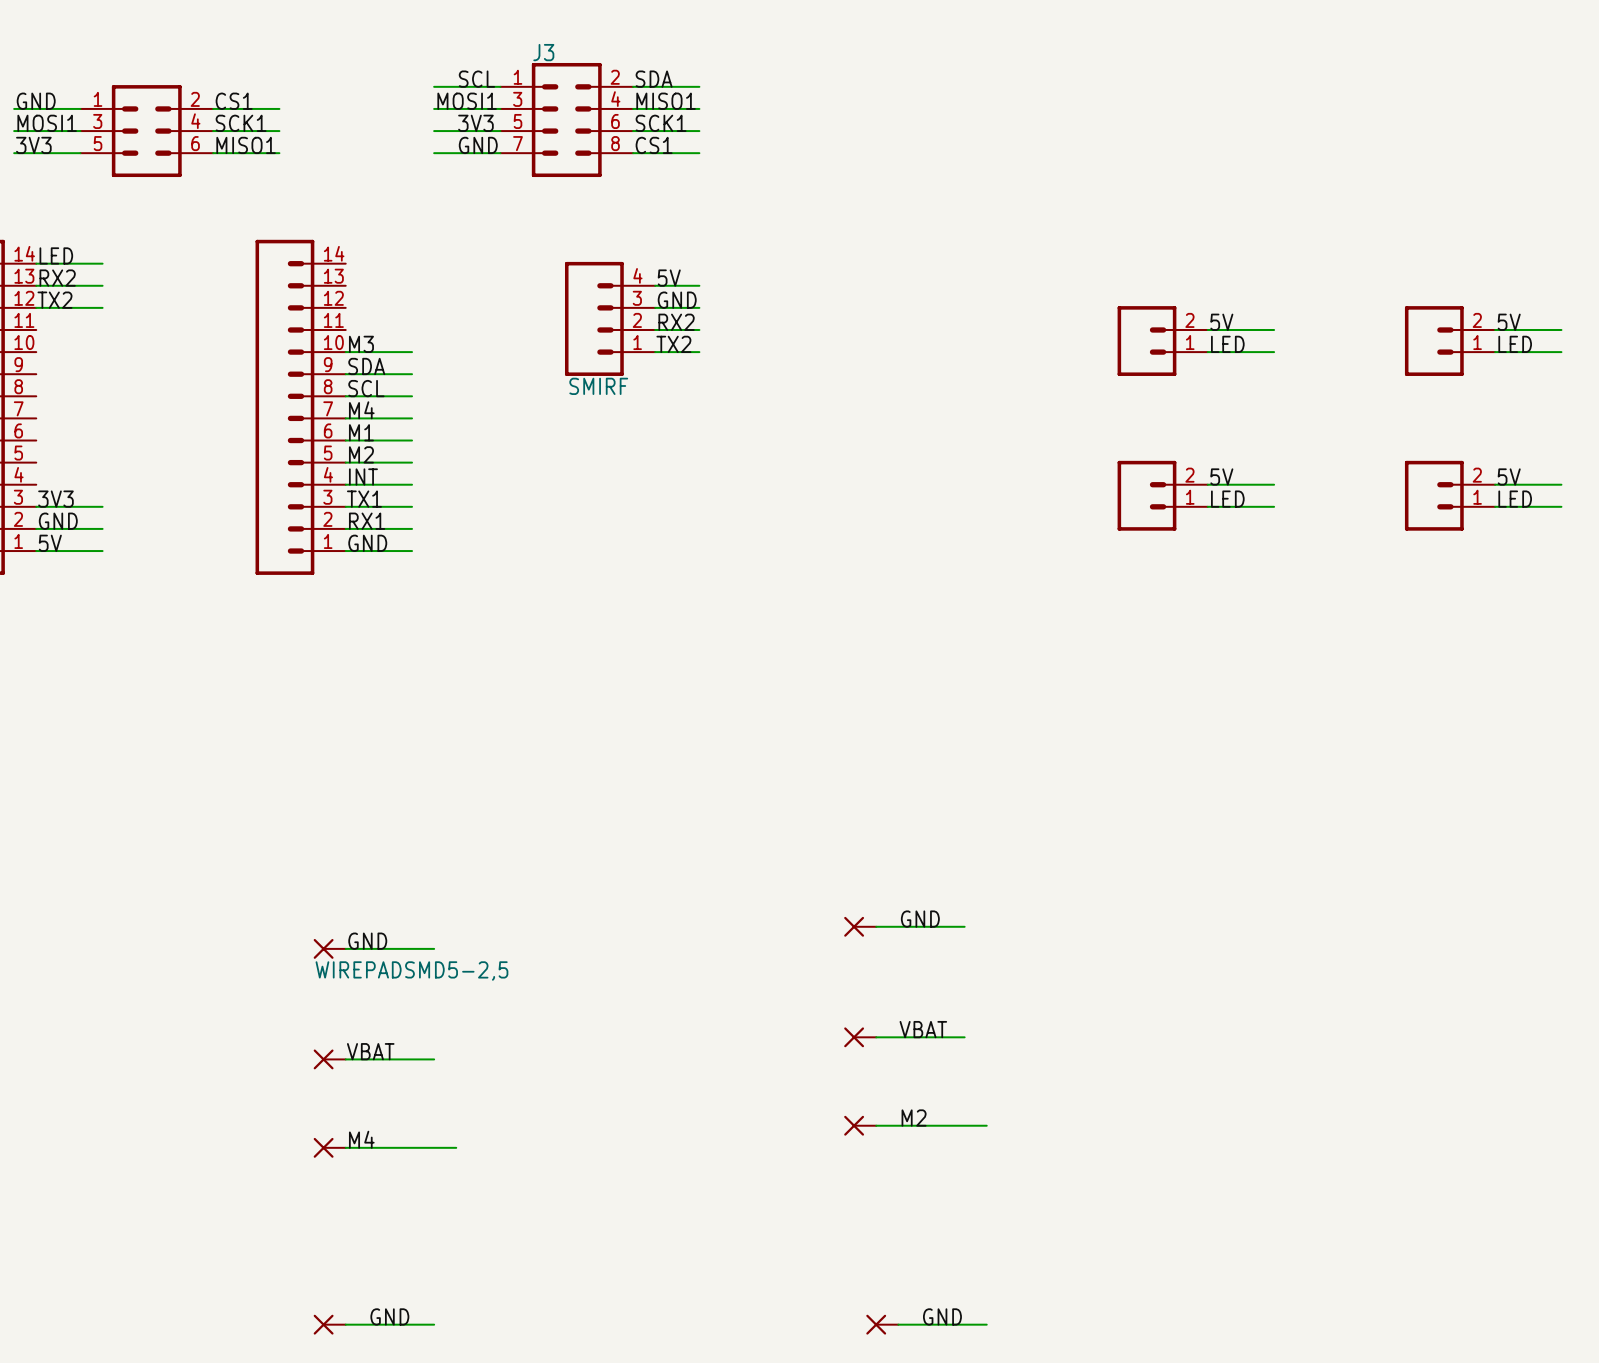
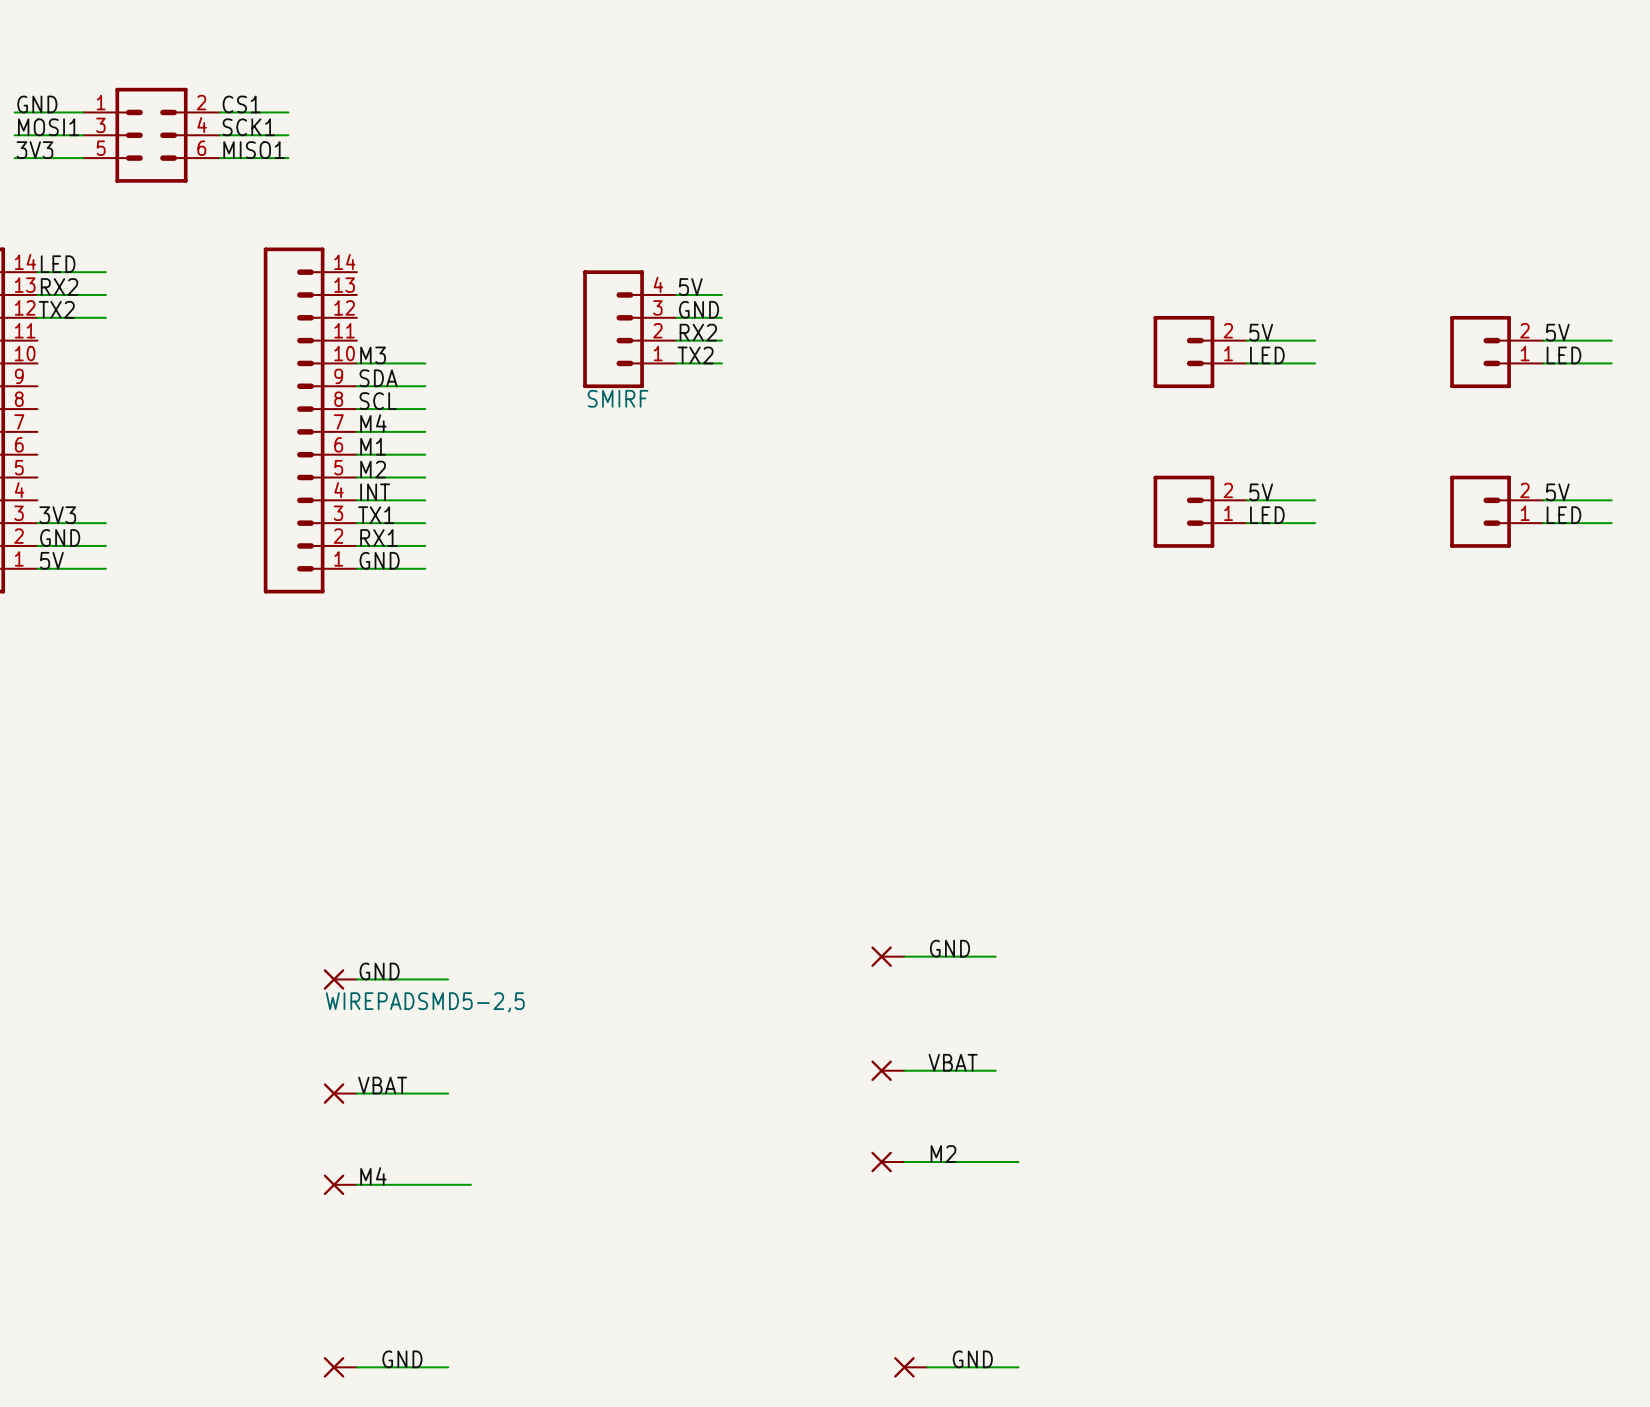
label: SCL (476, 79) -> none
label: SDA (654, 79) -> none
wire: (434, 86) (500, 86) -> none
wire: (633, 86) (699, 86) -> none
label: MOSI1 (467, 101) -> none
label: MISO1 (666, 101) -> none
wire: (434, 108) (500, 108) -> none
wire: (633, 108) (699, 108) -> none
J3: (566, 120) -> none
label: 3V3 (475, 123) -> none
label: SCK1 (661, 123) -> none
wire: (434, 131) (500, 131) -> none
wire: (633, 131) (699, 131) -> none
label: GND (478, 145) -> none
label: CS1 (654, 145) -> none
wire: (434, 153) (500, 153) -> none
wire: (633, 153) (699, 153) -> none

